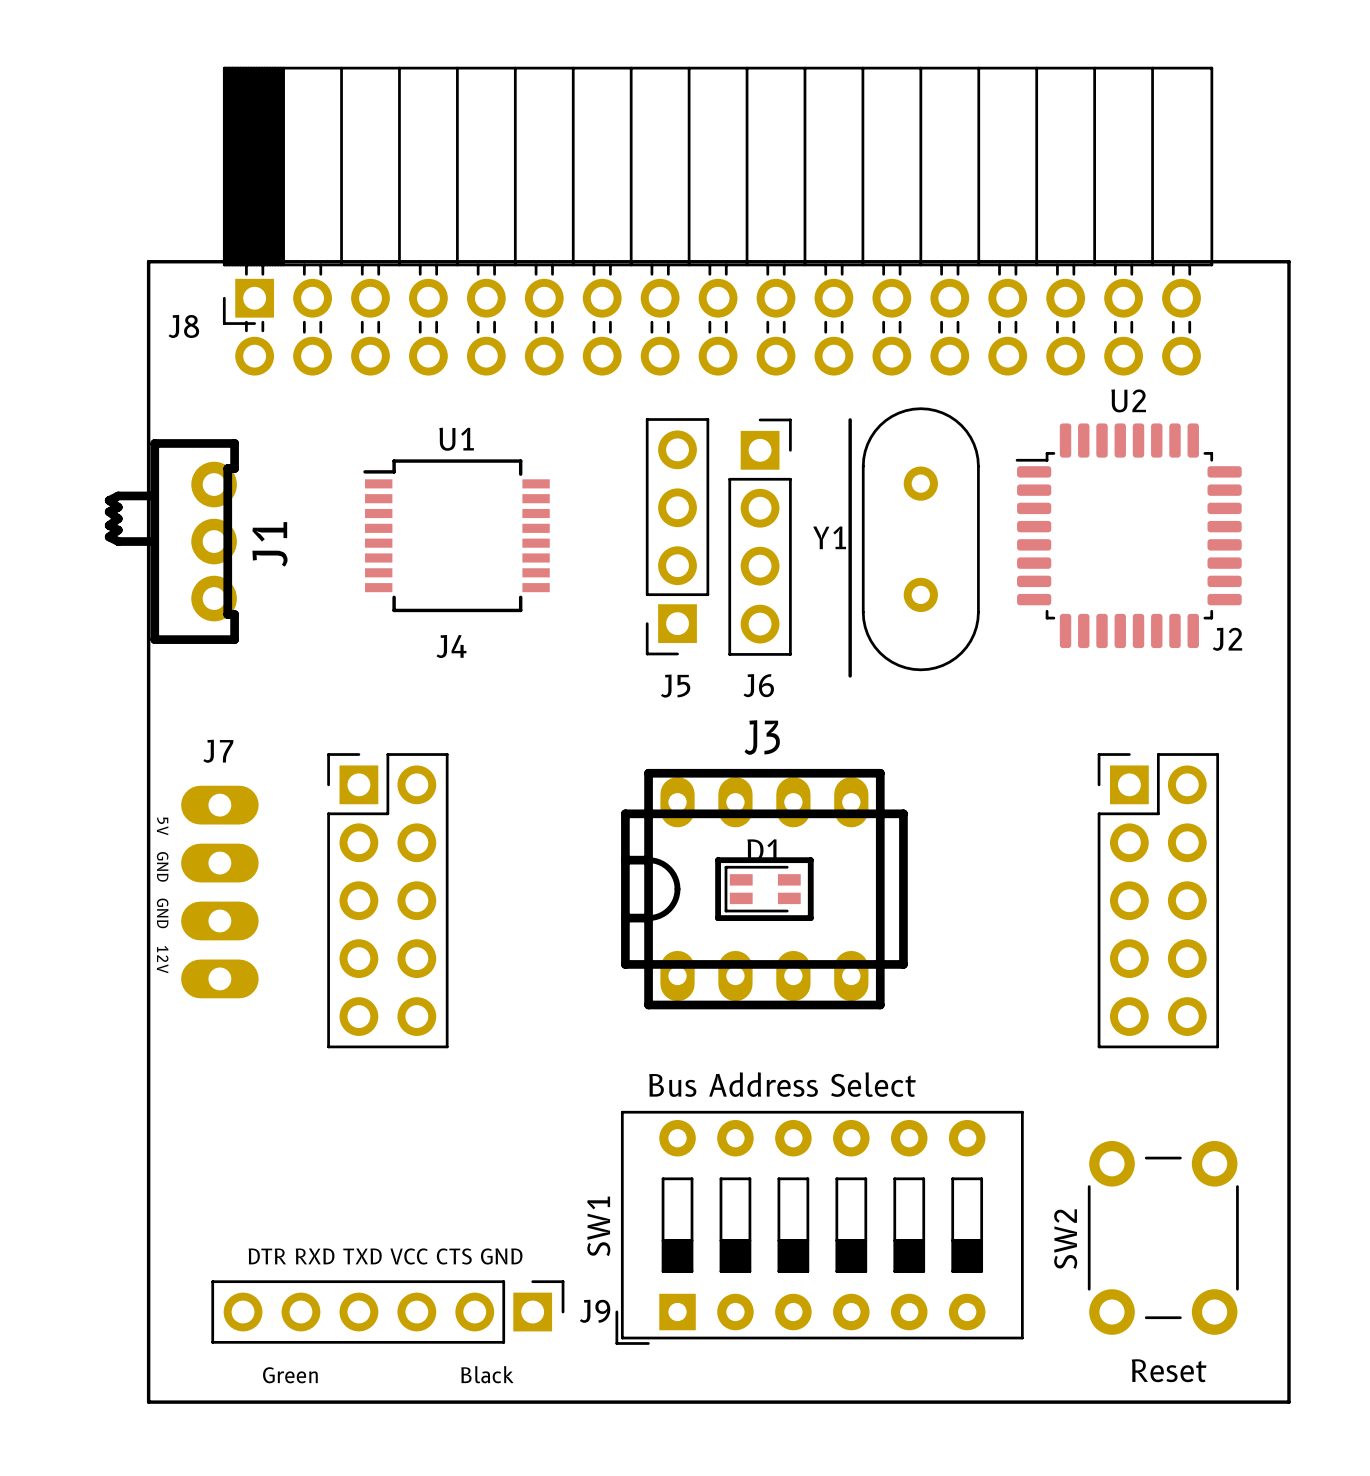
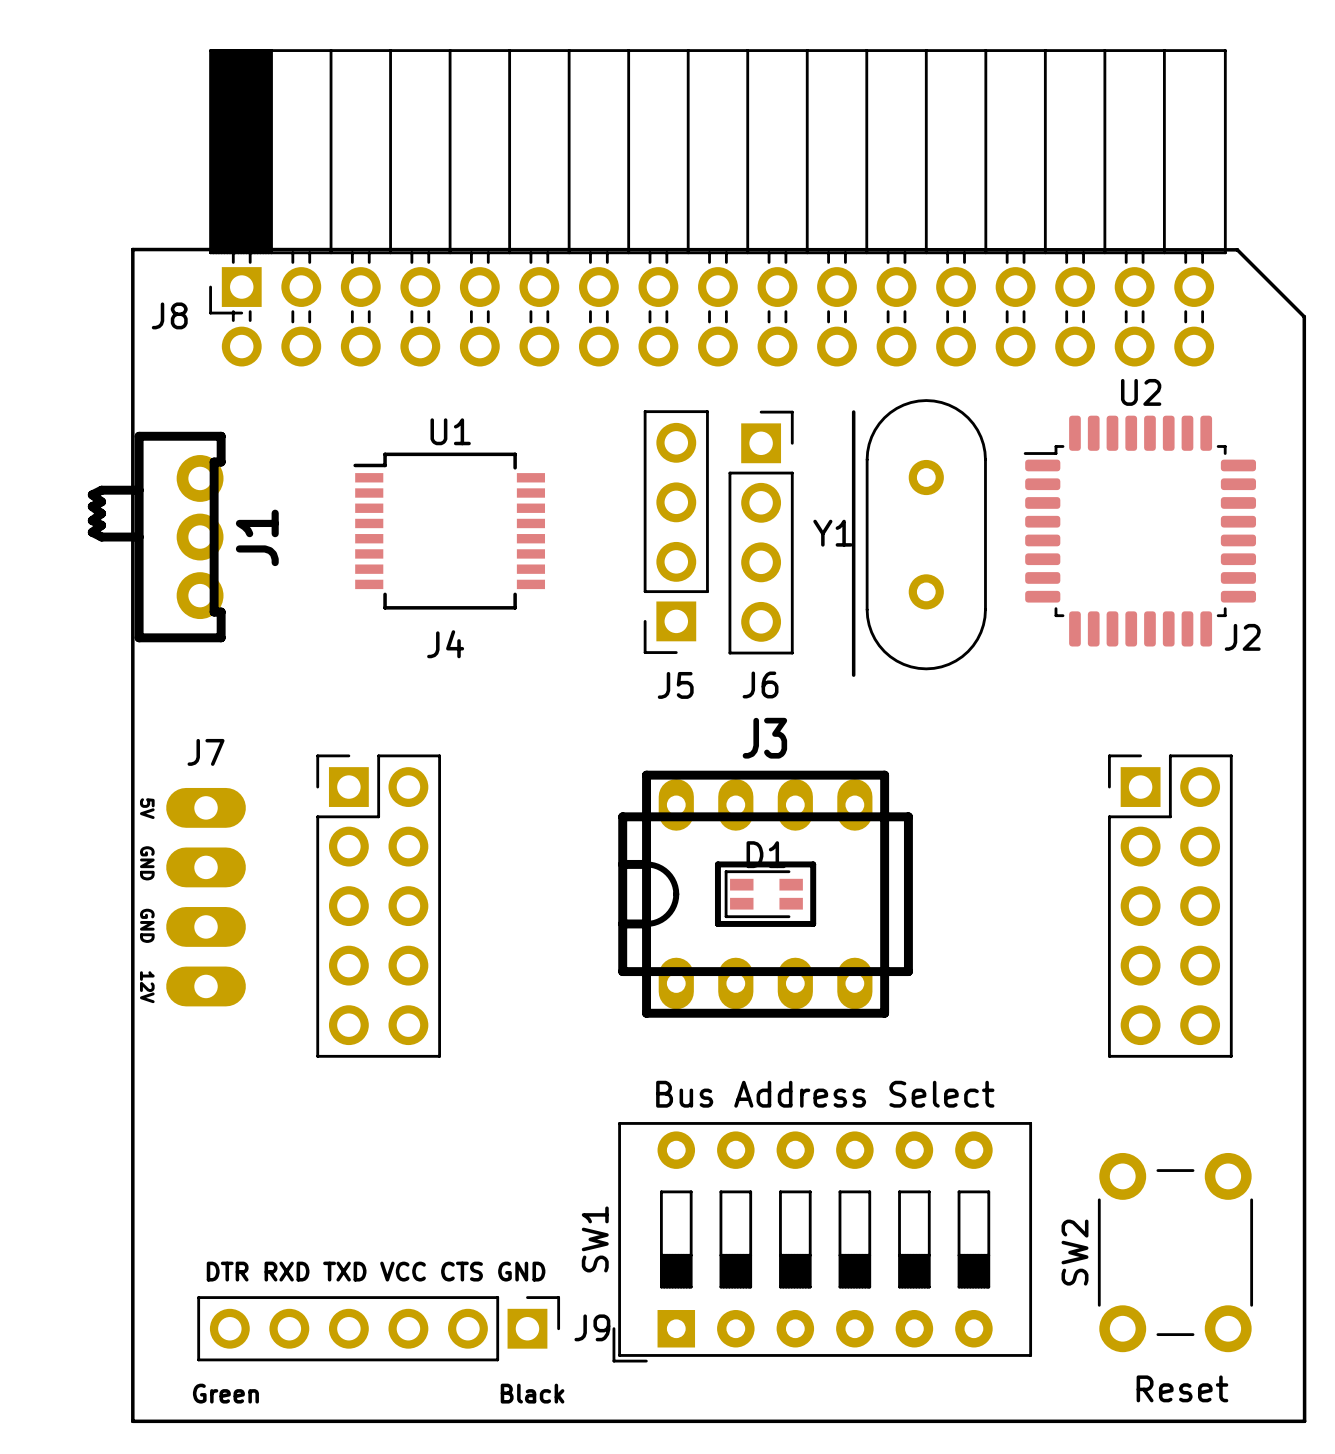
board edge: (148, 261) (1288, 261) (1288, 1402) -> (132, 249) (1237, 249) (1304, 316) (1304, 1421)
text position: Bus Address Select (782, 1084) -> Bus Address Select (825, 1094)

